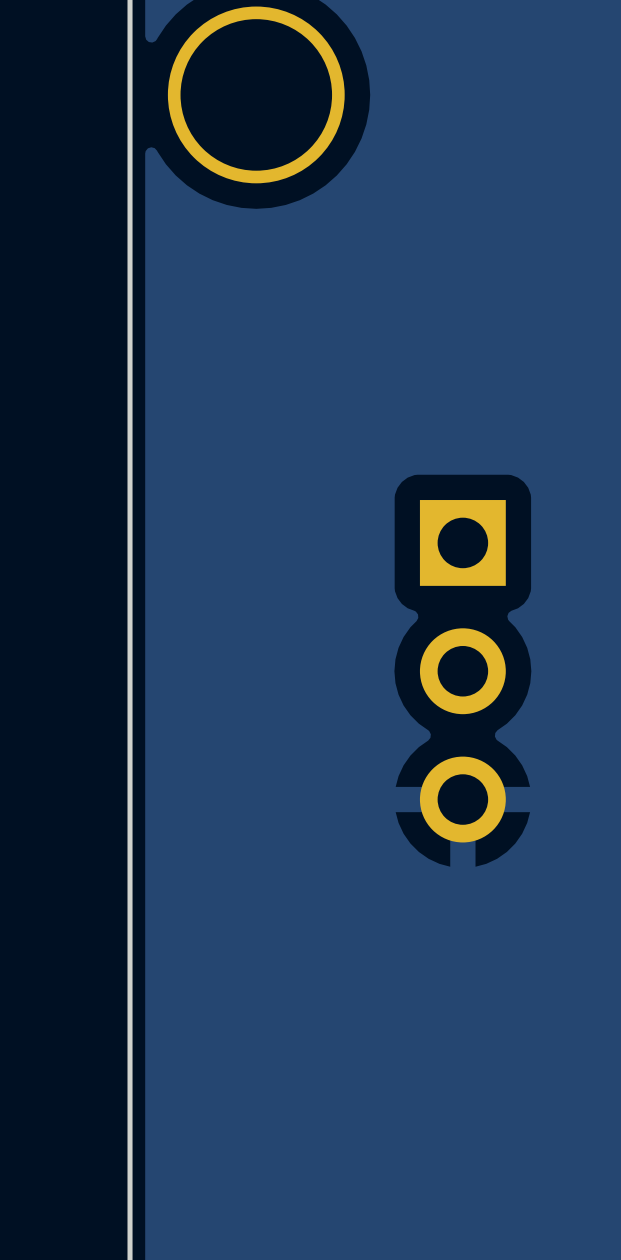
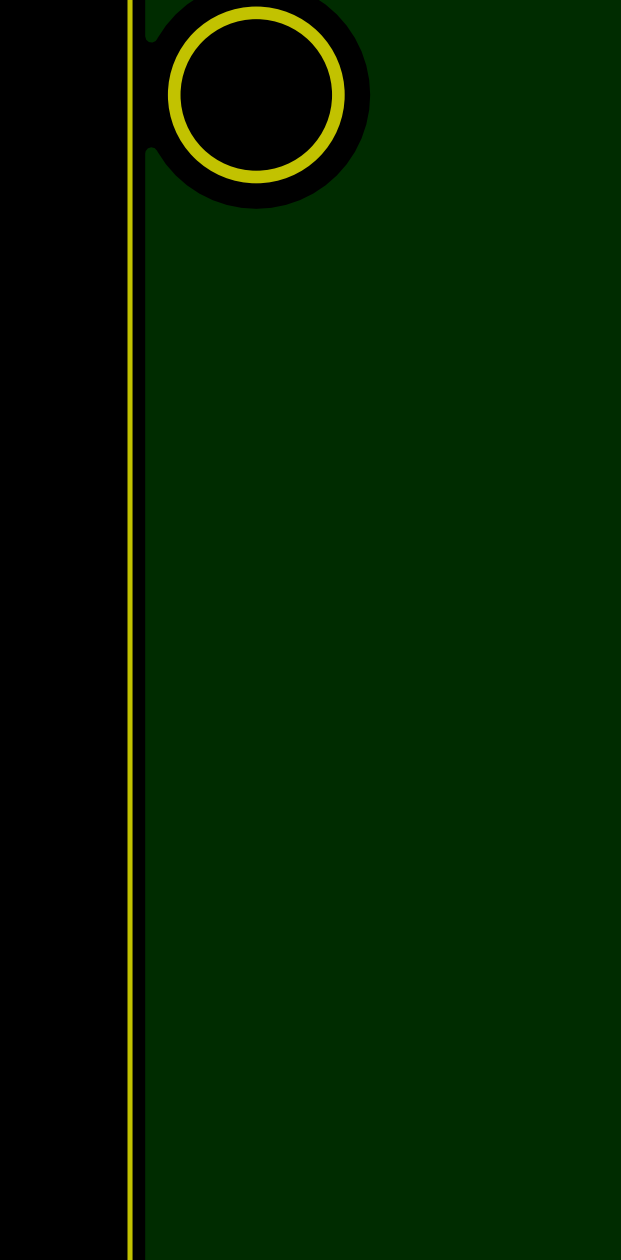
part: (462, 671) -> none

